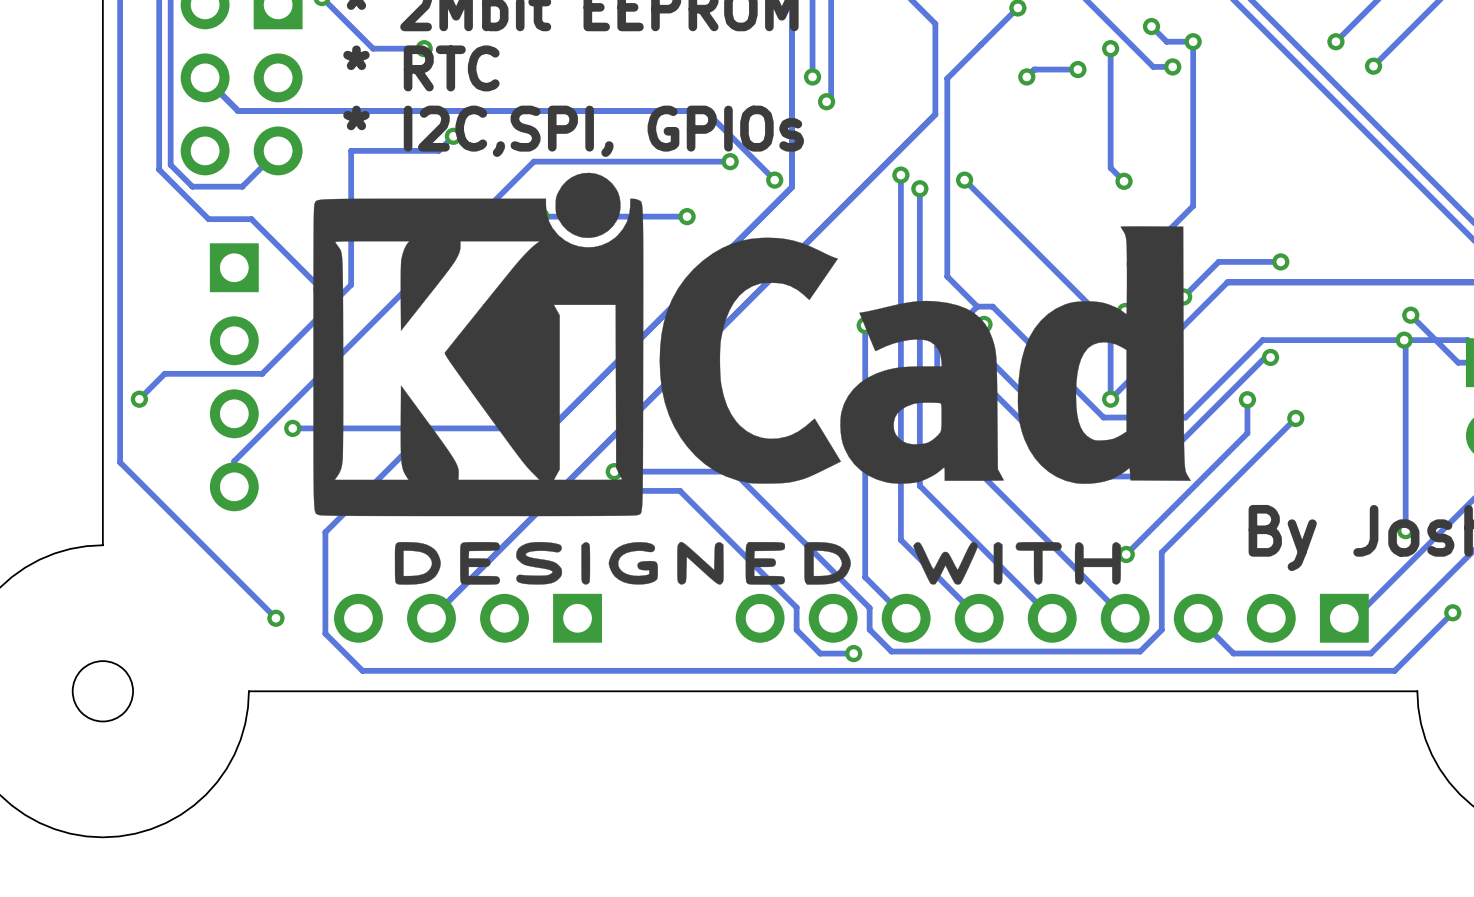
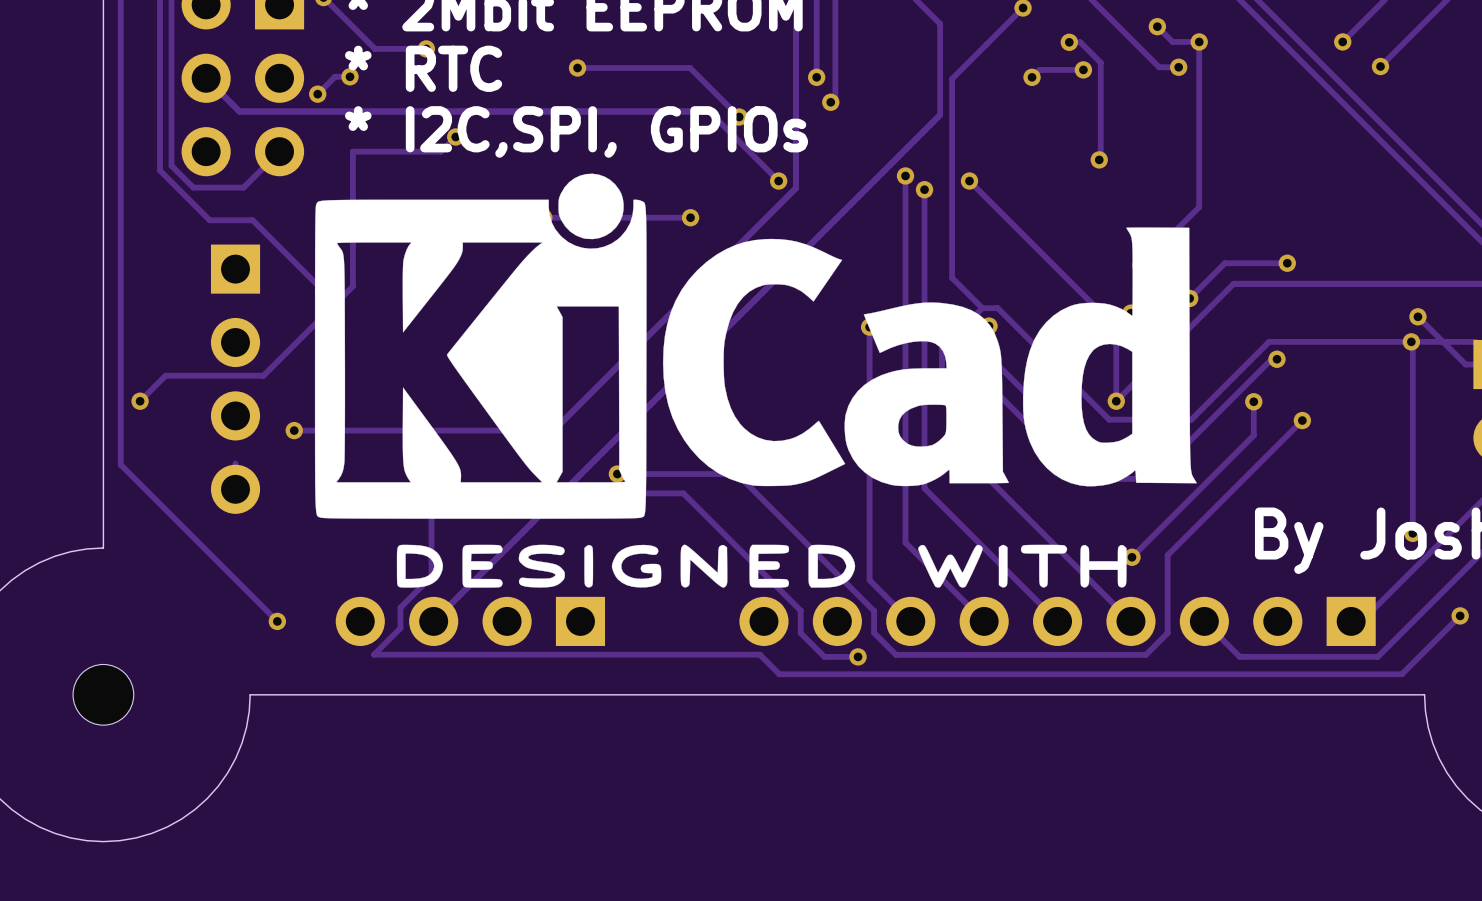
track: none -> (1069, 42) (1080, 42) (1100, 62) (1099, 159)
track: (1110, 48) (1110, 167) (1124, 181) -> none
via position: (1110, 48) -> (1069, 42)
track: none -> (577, 67) (690, 67) (739, 117)
via: none -> (577, 67)
track: none -> (350, 76) (335, 76) (317, 94)
via: none -> (350, 76)
via: none -> (317, 94)
track: (730, 161) (533, 161) (234, 461) -> none
via position: (730, 161) -> (739, 117)
via position: (1124, 181) -> (1099, 159)
track: (429, 428) (325, 532) (325, 633) (362, 670) (775, 670) -> (431, 430) (431, 576) (400, 607) (400, 628) (374, 654) (759, 654) (779, 674)

